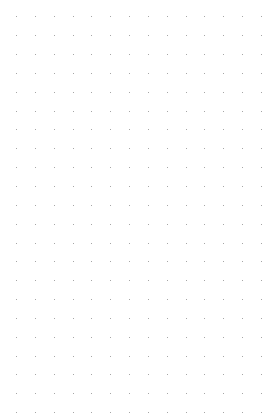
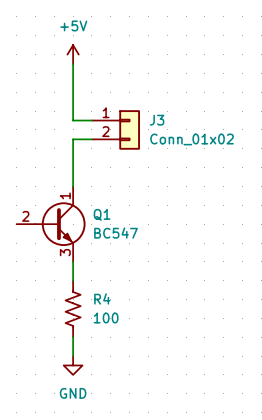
power symbol: none -> +5V (73, 54)
wire: none -> (73, 64) (73, 120) (91, 120)
J3: none -> Conn_01x02 (115, 129)
wire: none -> (91, 139) (73, 139) (73, 186)
Q1: none -> BC547 (51, 224)
wire: none -> (73, 261) (73, 280)
R4: none -> 100 (73, 308)
wire: none -> (73, 337) (73, 356)
power symbol: none -> GND (73, 365)

